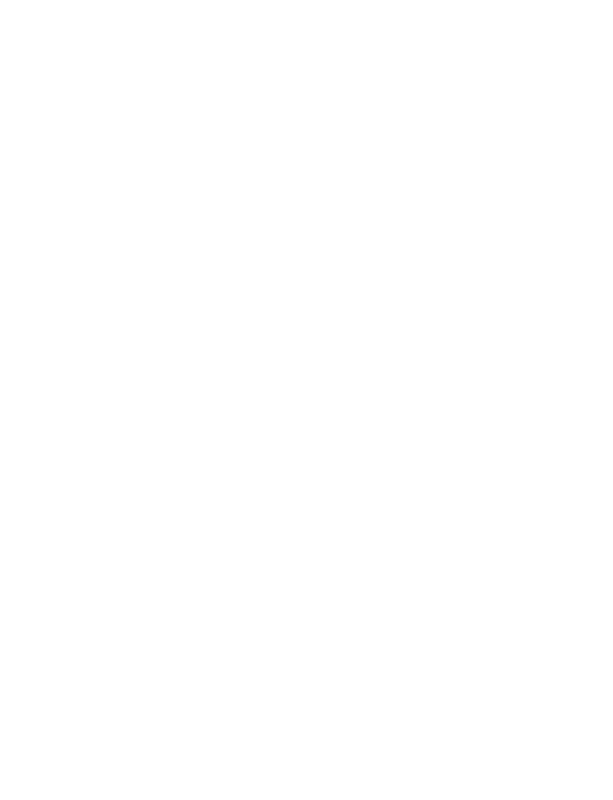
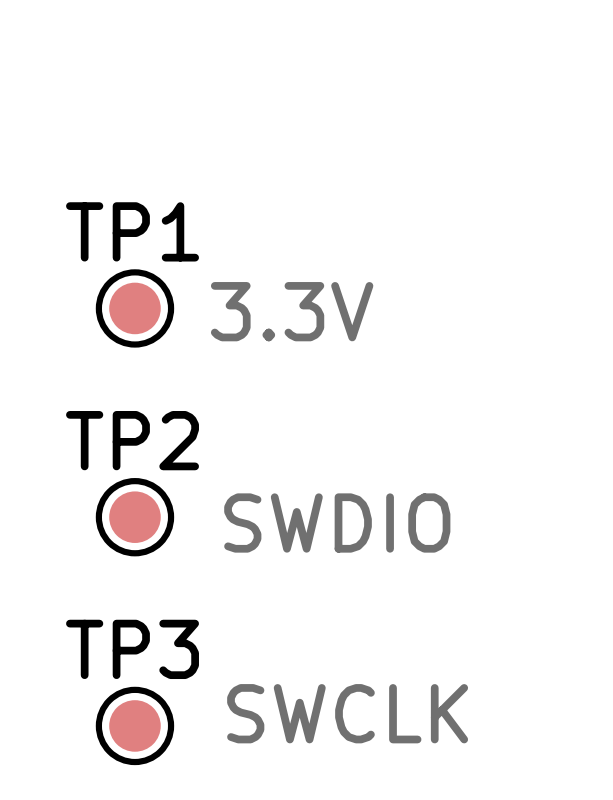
TP1: none -> 3.3V (134, 308)
TP2: none -> SWDIO (134, 517)
TP3: none -> SWCLK (134, 725)

